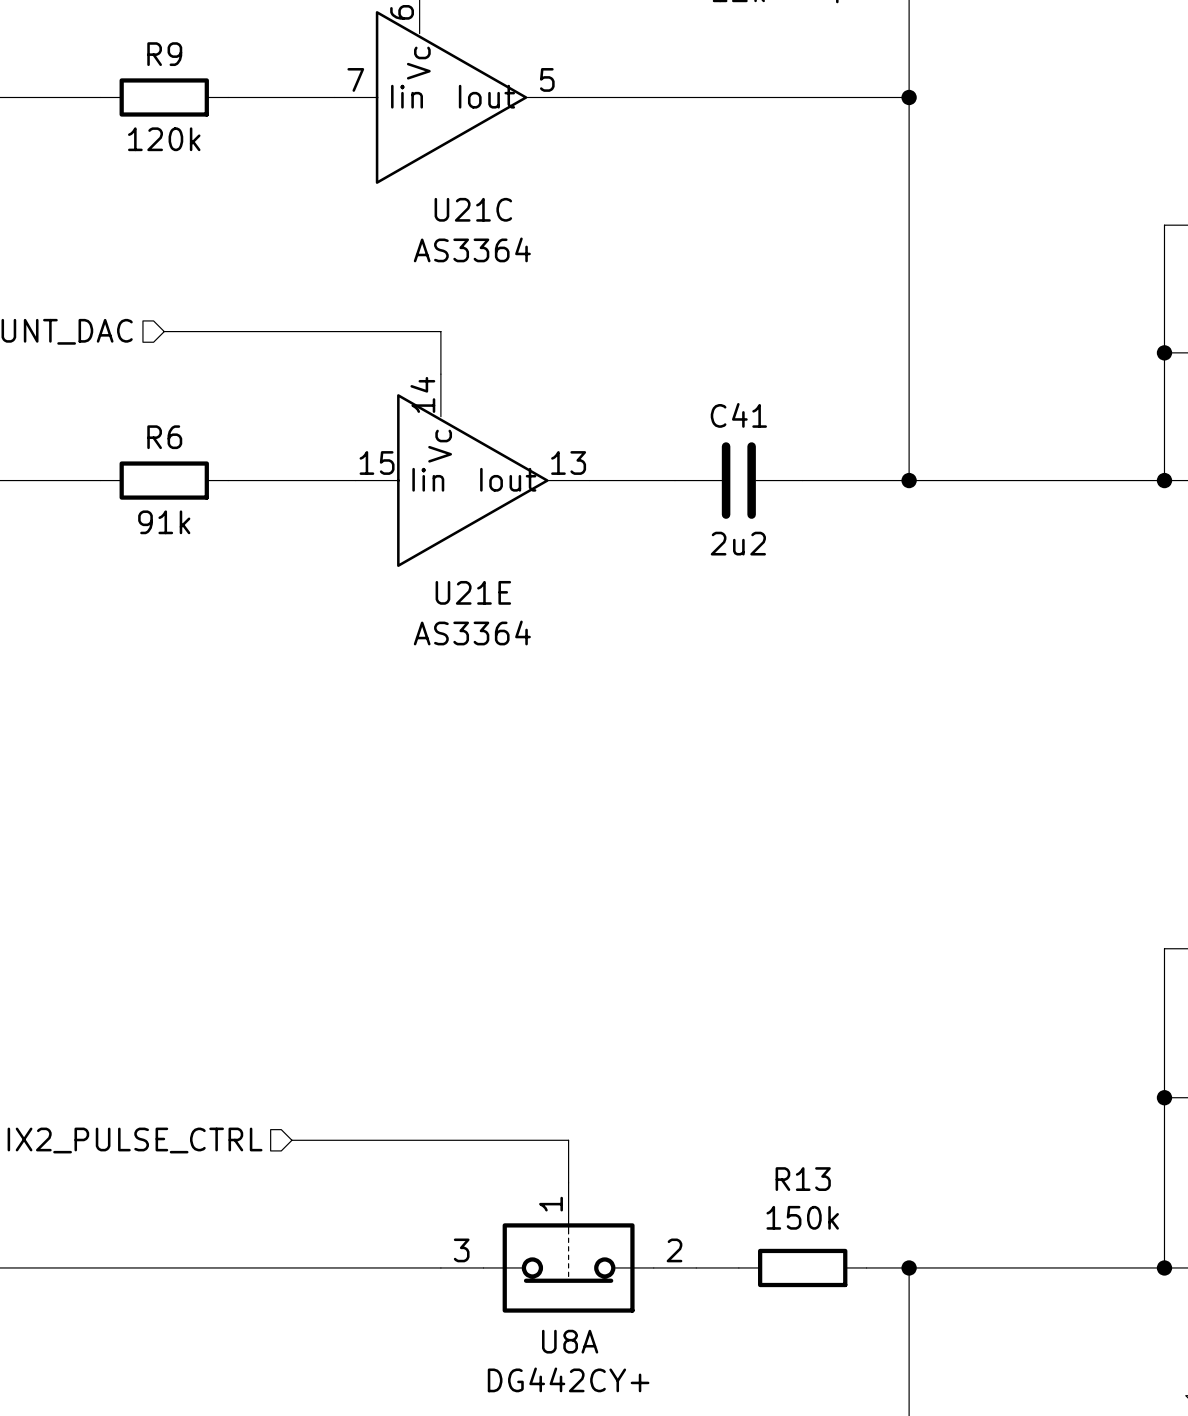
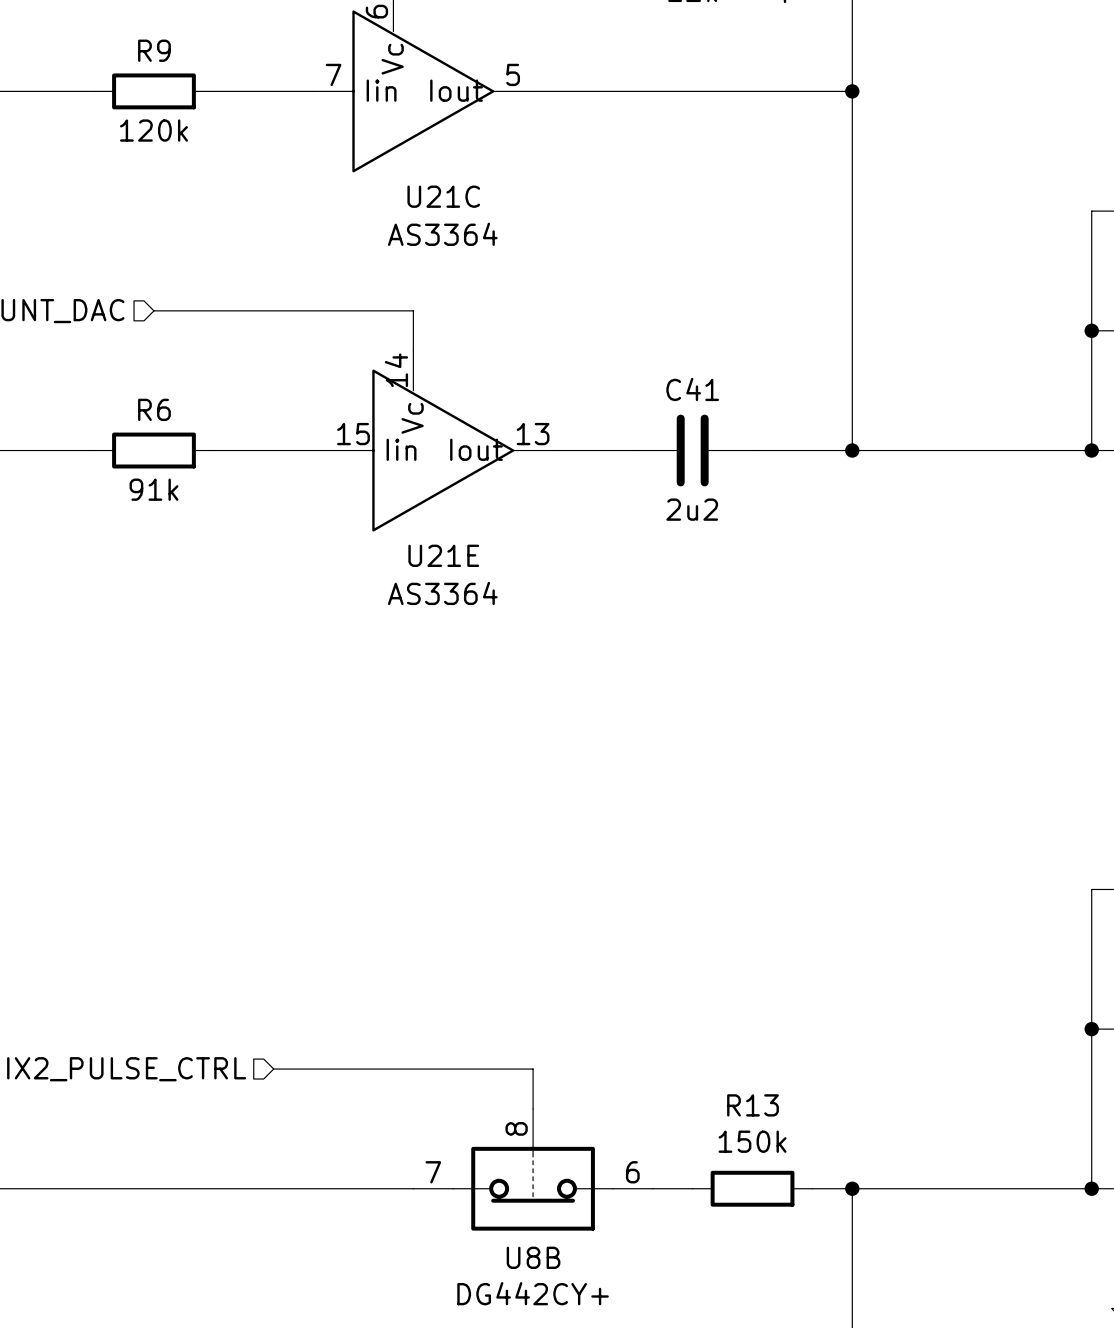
U8A pin number: 1 (551, 1204) -> 8 (516, 1128)
U8A pin number: 3 (461, 1250) -> 7 (433, 1172)
U8A pin number: 2 (674, 1250) -> 6 (632, 1172)
U8A name: U8A (570, 1341) -> U8B (533, 1257)

